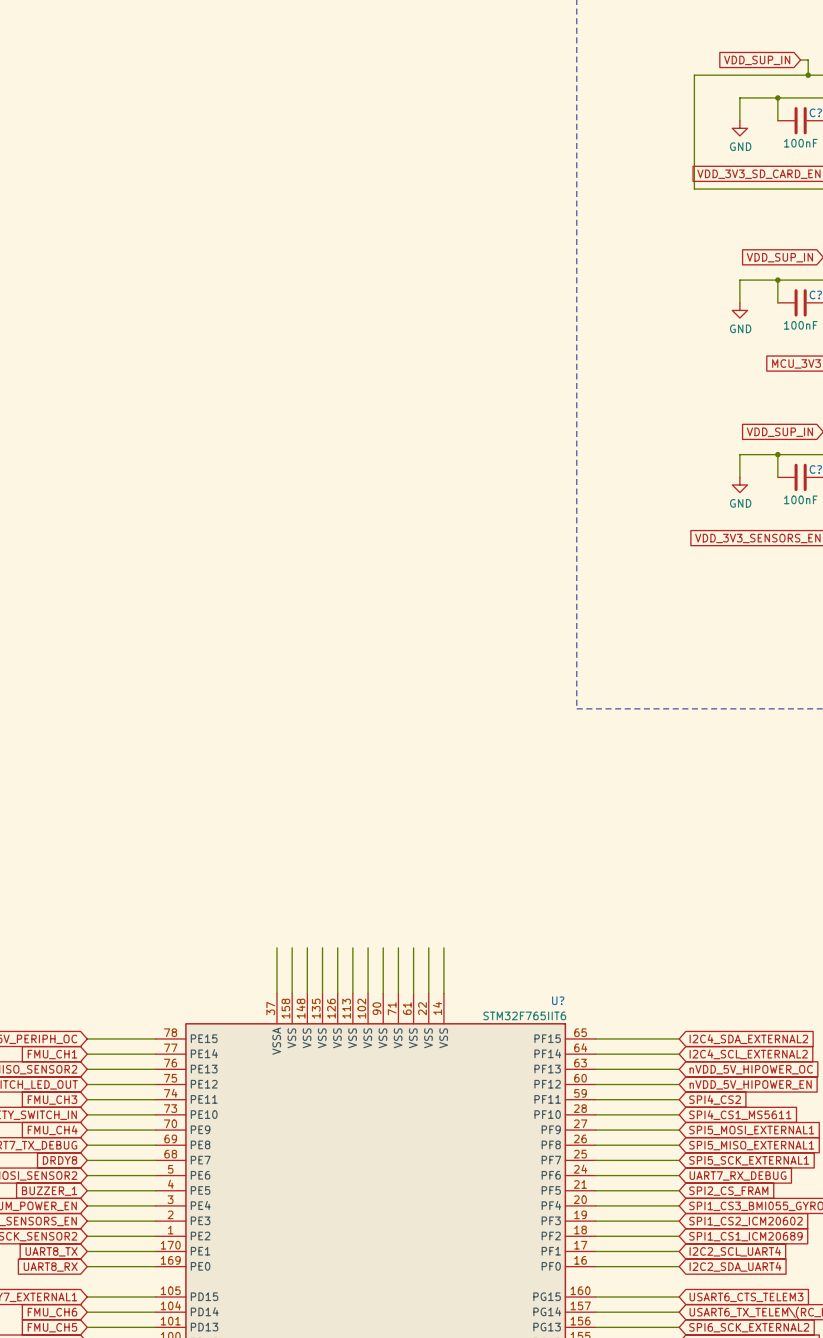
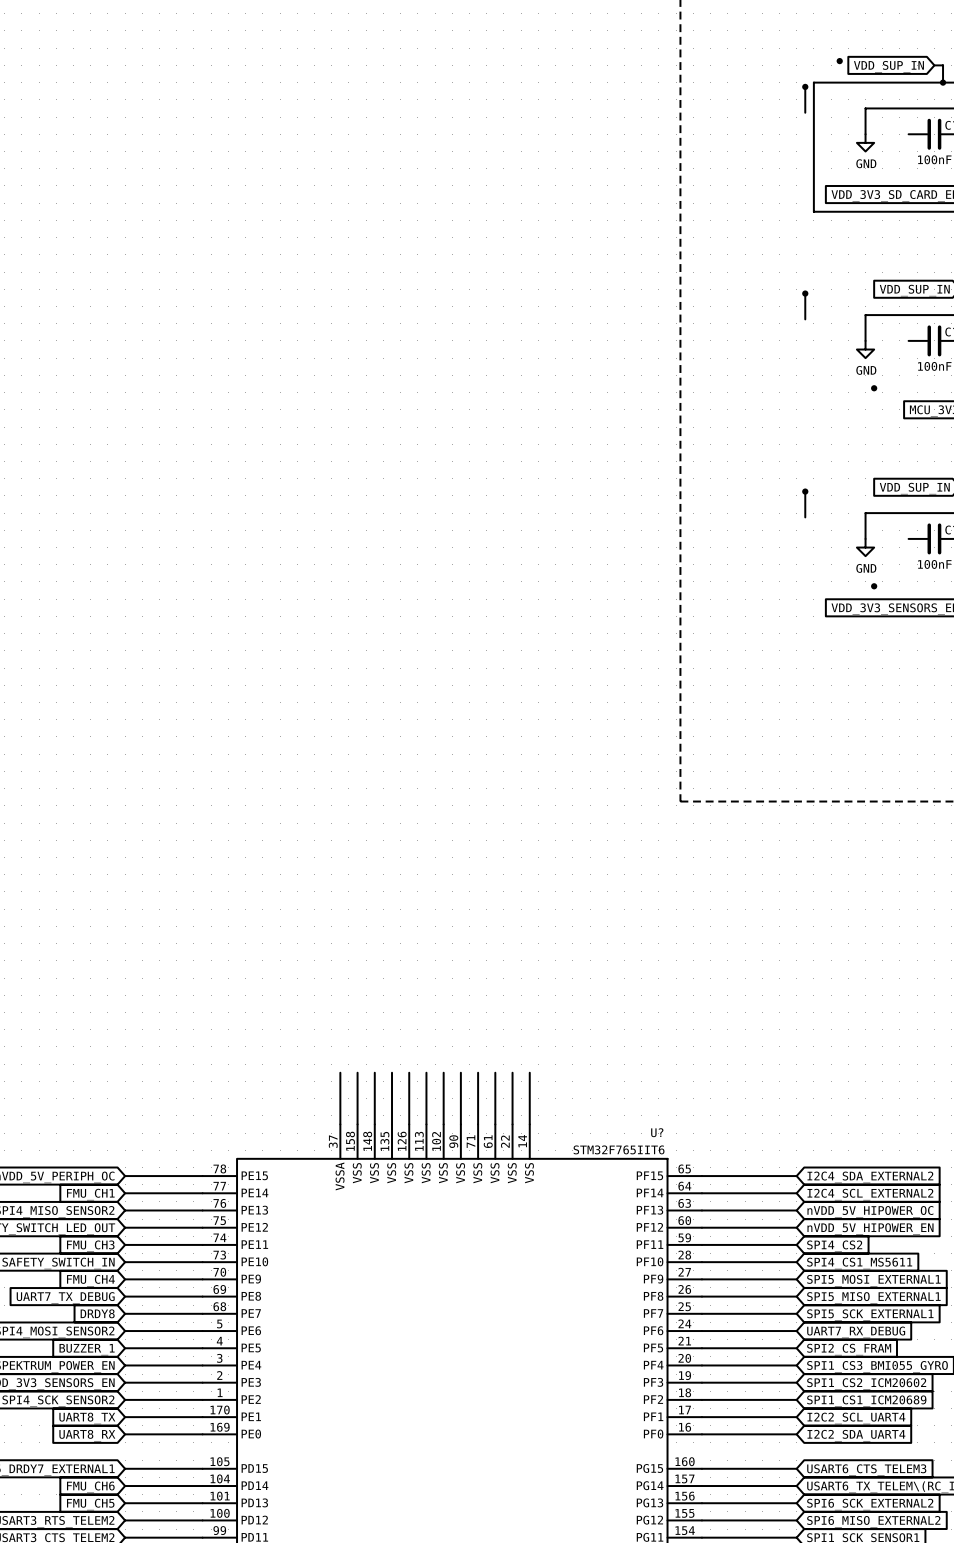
junction: none -> (839, 61)
junction: none -> (805, 86)
wire: (777, 97) (777, 120) -> (805, 86) (805, 112)
junction: (777, 97) -> none
junction: none -> (805, 293)
wire: (777, 280) (777, 302) -> (805, 293) (805, 319)
junction: (777, 280) -> none
junction: none -> (874, 388)
junction: none -> (805, 491)
wire: (777, 454) (777, 477) -> (805, 491) (805, 517)
junction: (777, 454) -> none
junction: none -> (874, 586)

